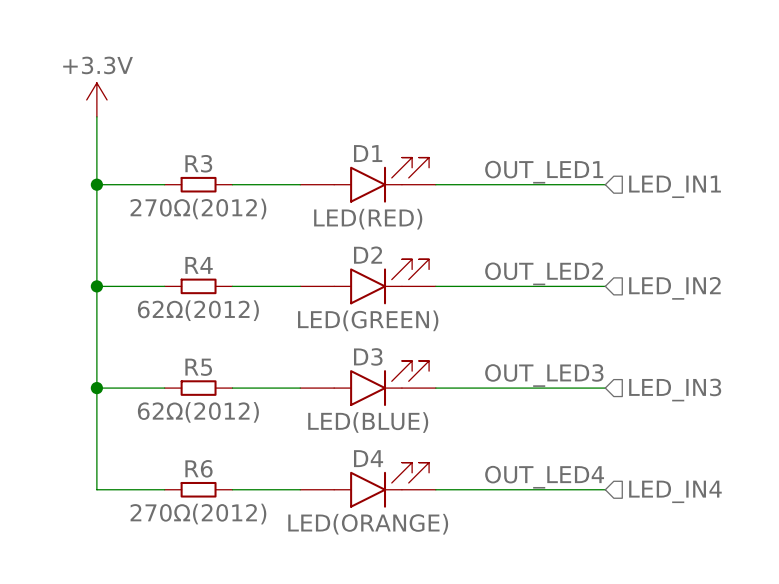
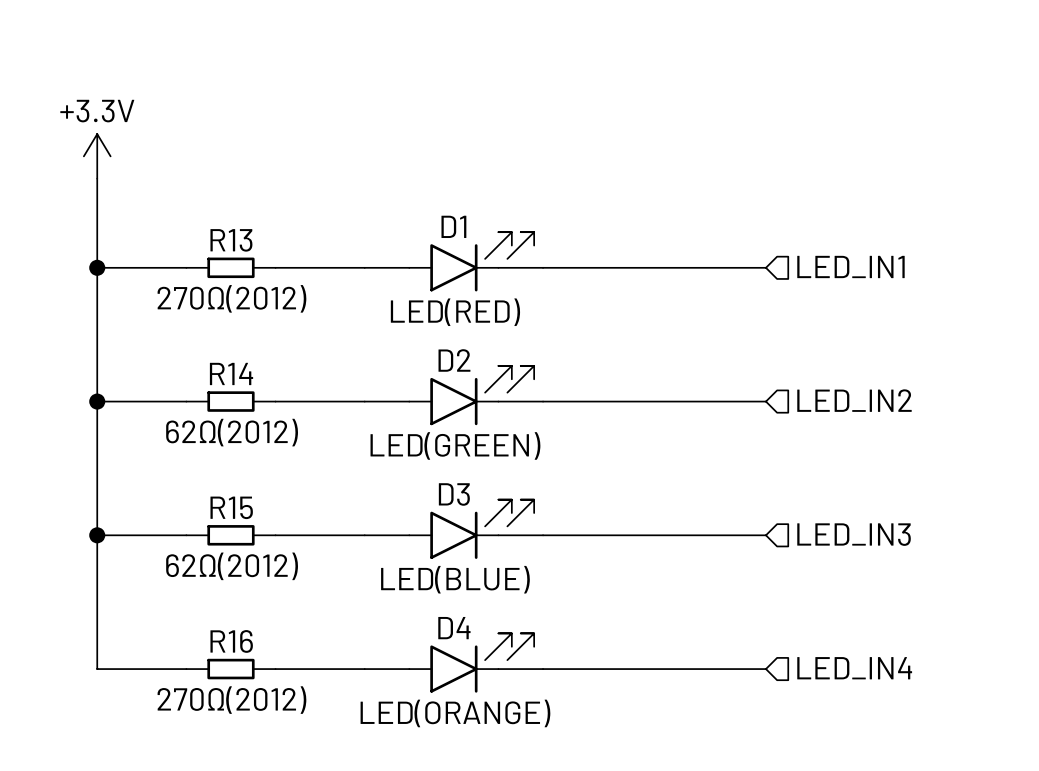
R3 name: R3 (198, 163) -> R13 (231, 240)
label: OUT_LED1 (544, 172) -> none
R4 name: R4 (199, 265) -> R14 (231, 373)
label: OUT_LED2 (544, 273) -> none
R5 name: R5 (198, 367) -> R15 (231, 507)
label: OUT_LED3 (544, 375) -> none
R6 name: R6 (198, 468) -> R16 (231, 641)
label: OUT_LED4 (544, 477) -> none

